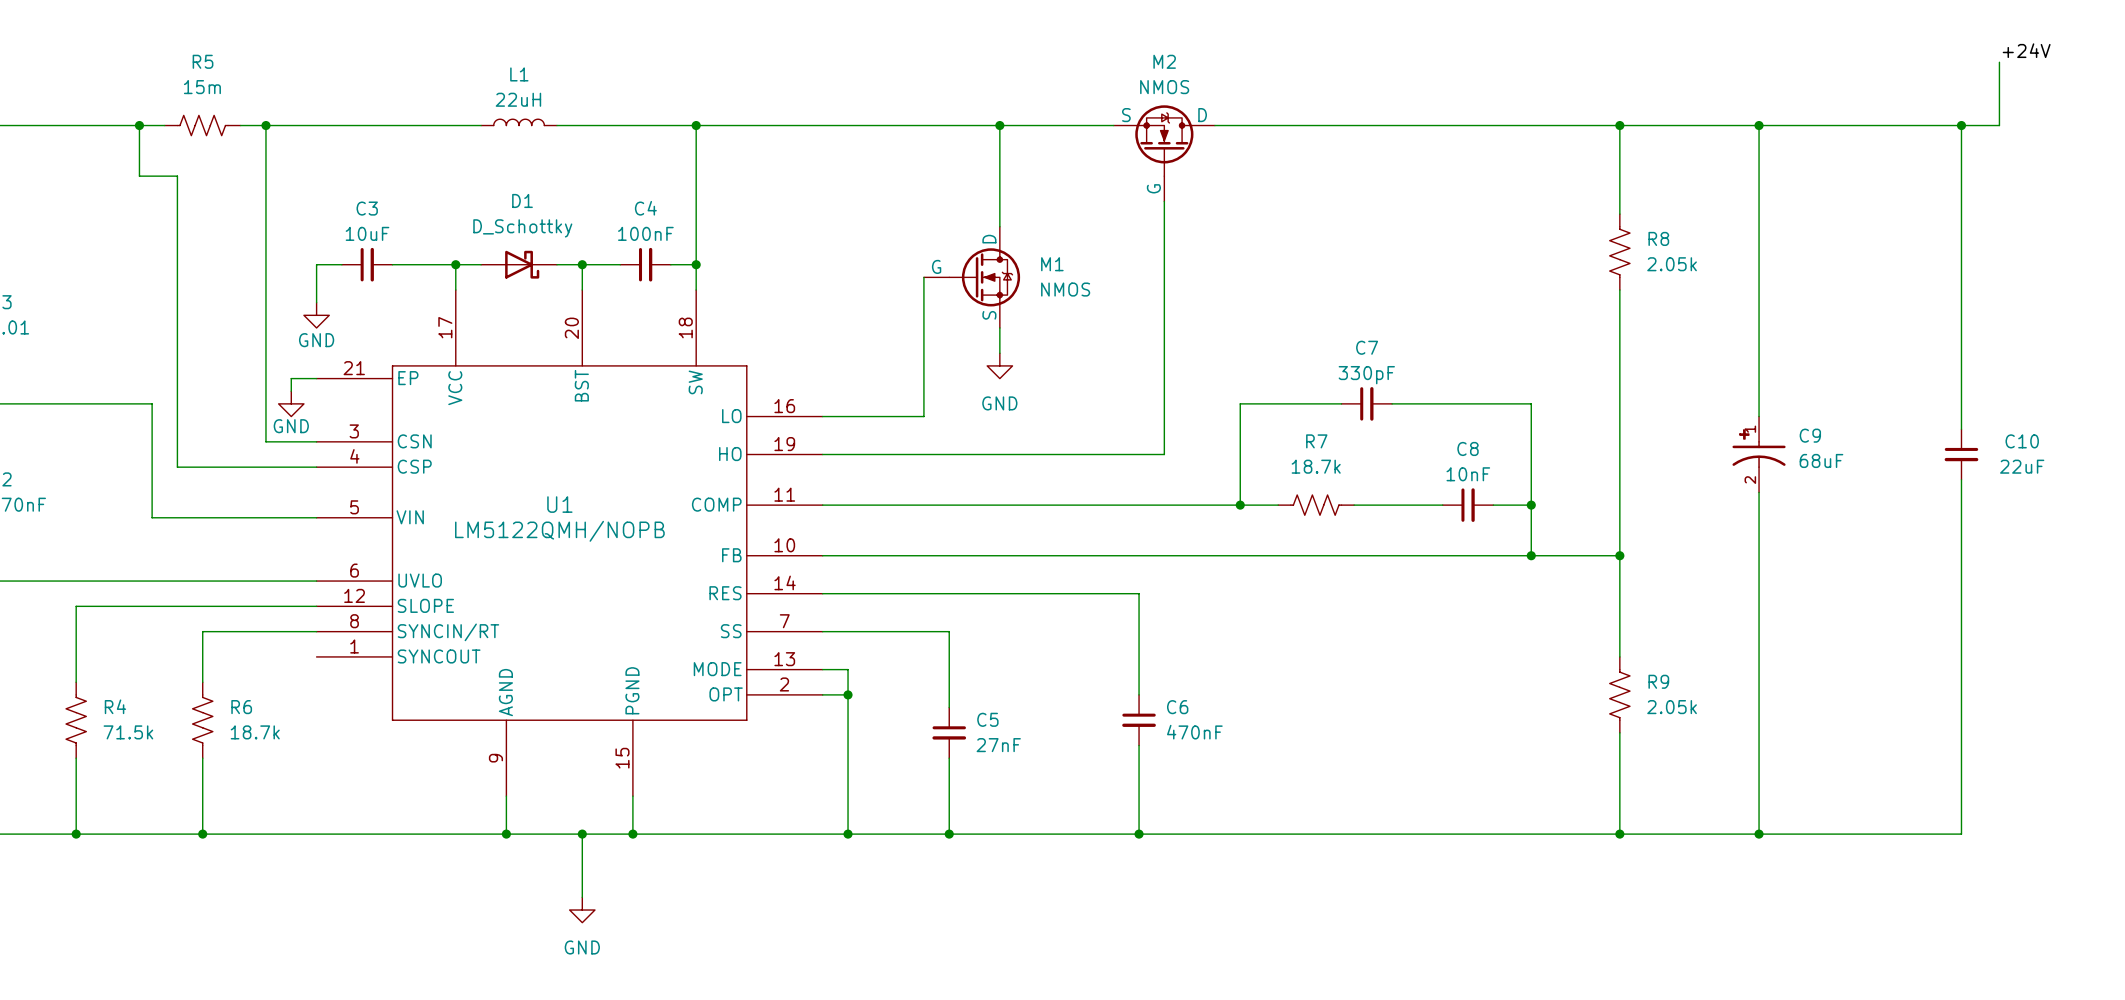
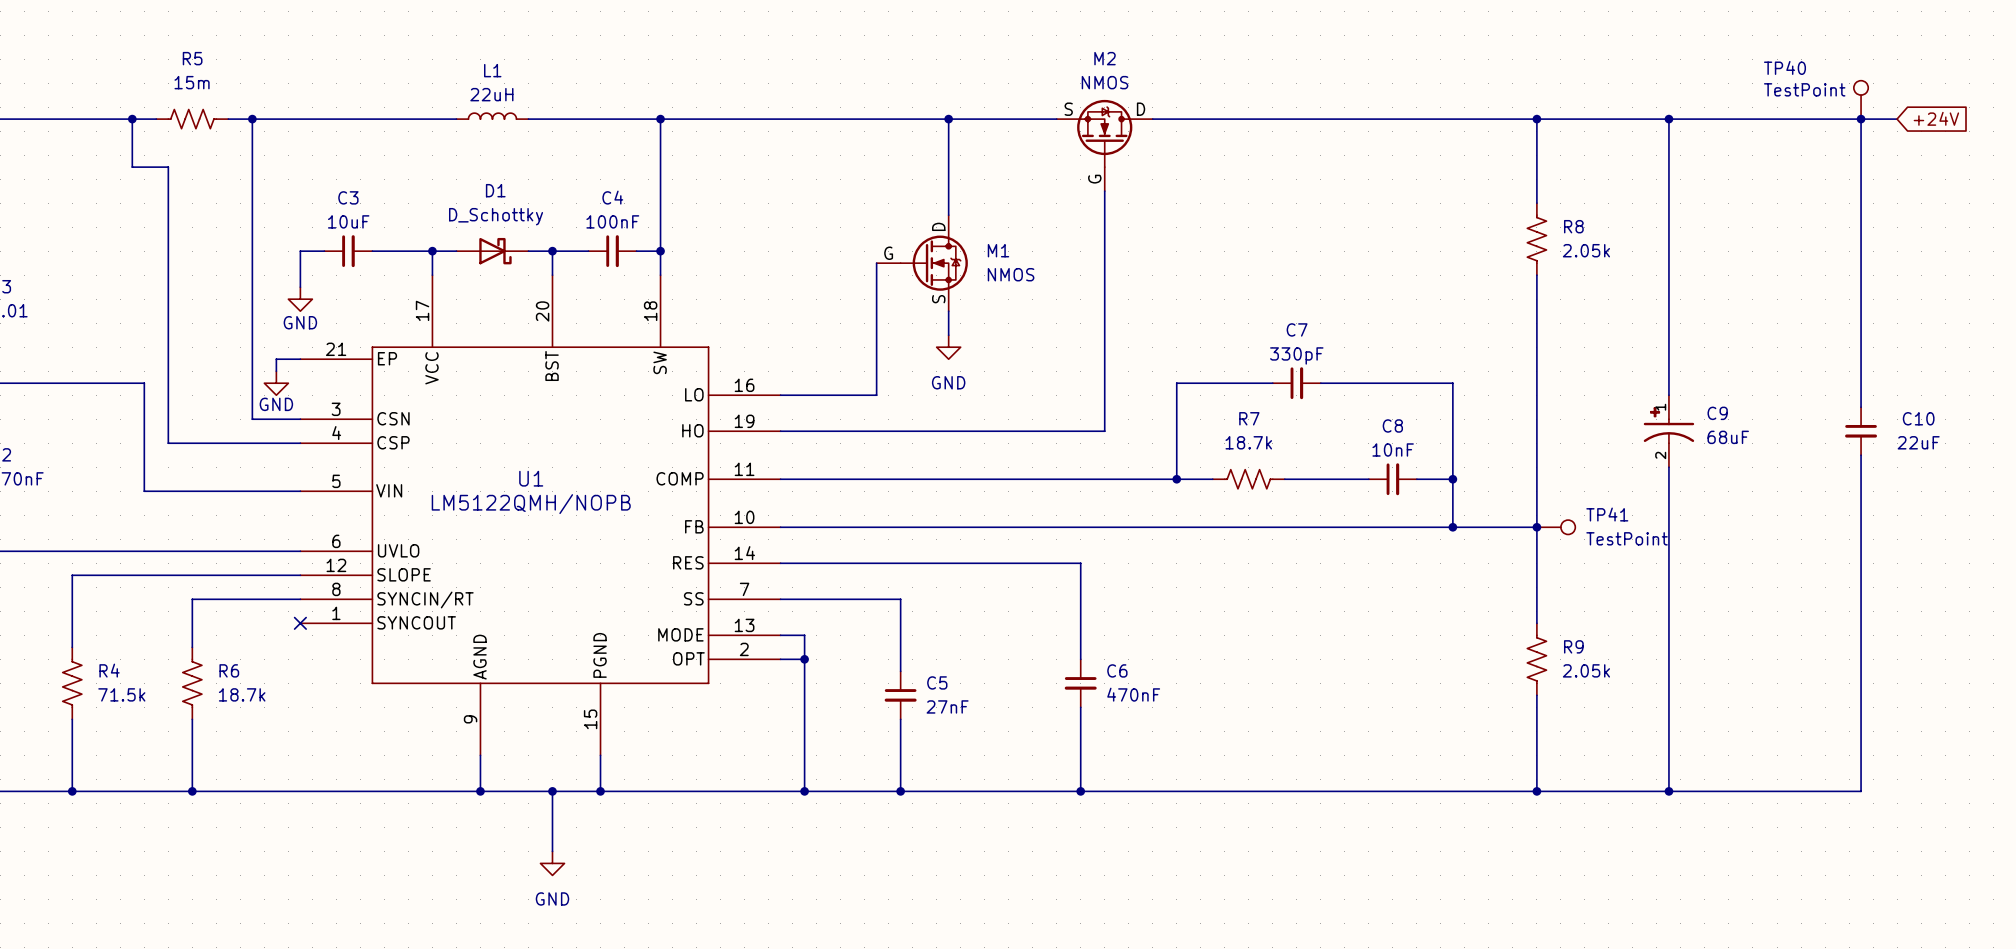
label: +24V (2026, 50) -> none
wire: (1999, 62) (1999, 125) -> none
TP40: none -> TestPoint (1861, 99)
global label: none -> +24V (1936, 118)
TP41: none -> TestPoint (1556, 527)
no-connect mark: none -> (300, 623)

